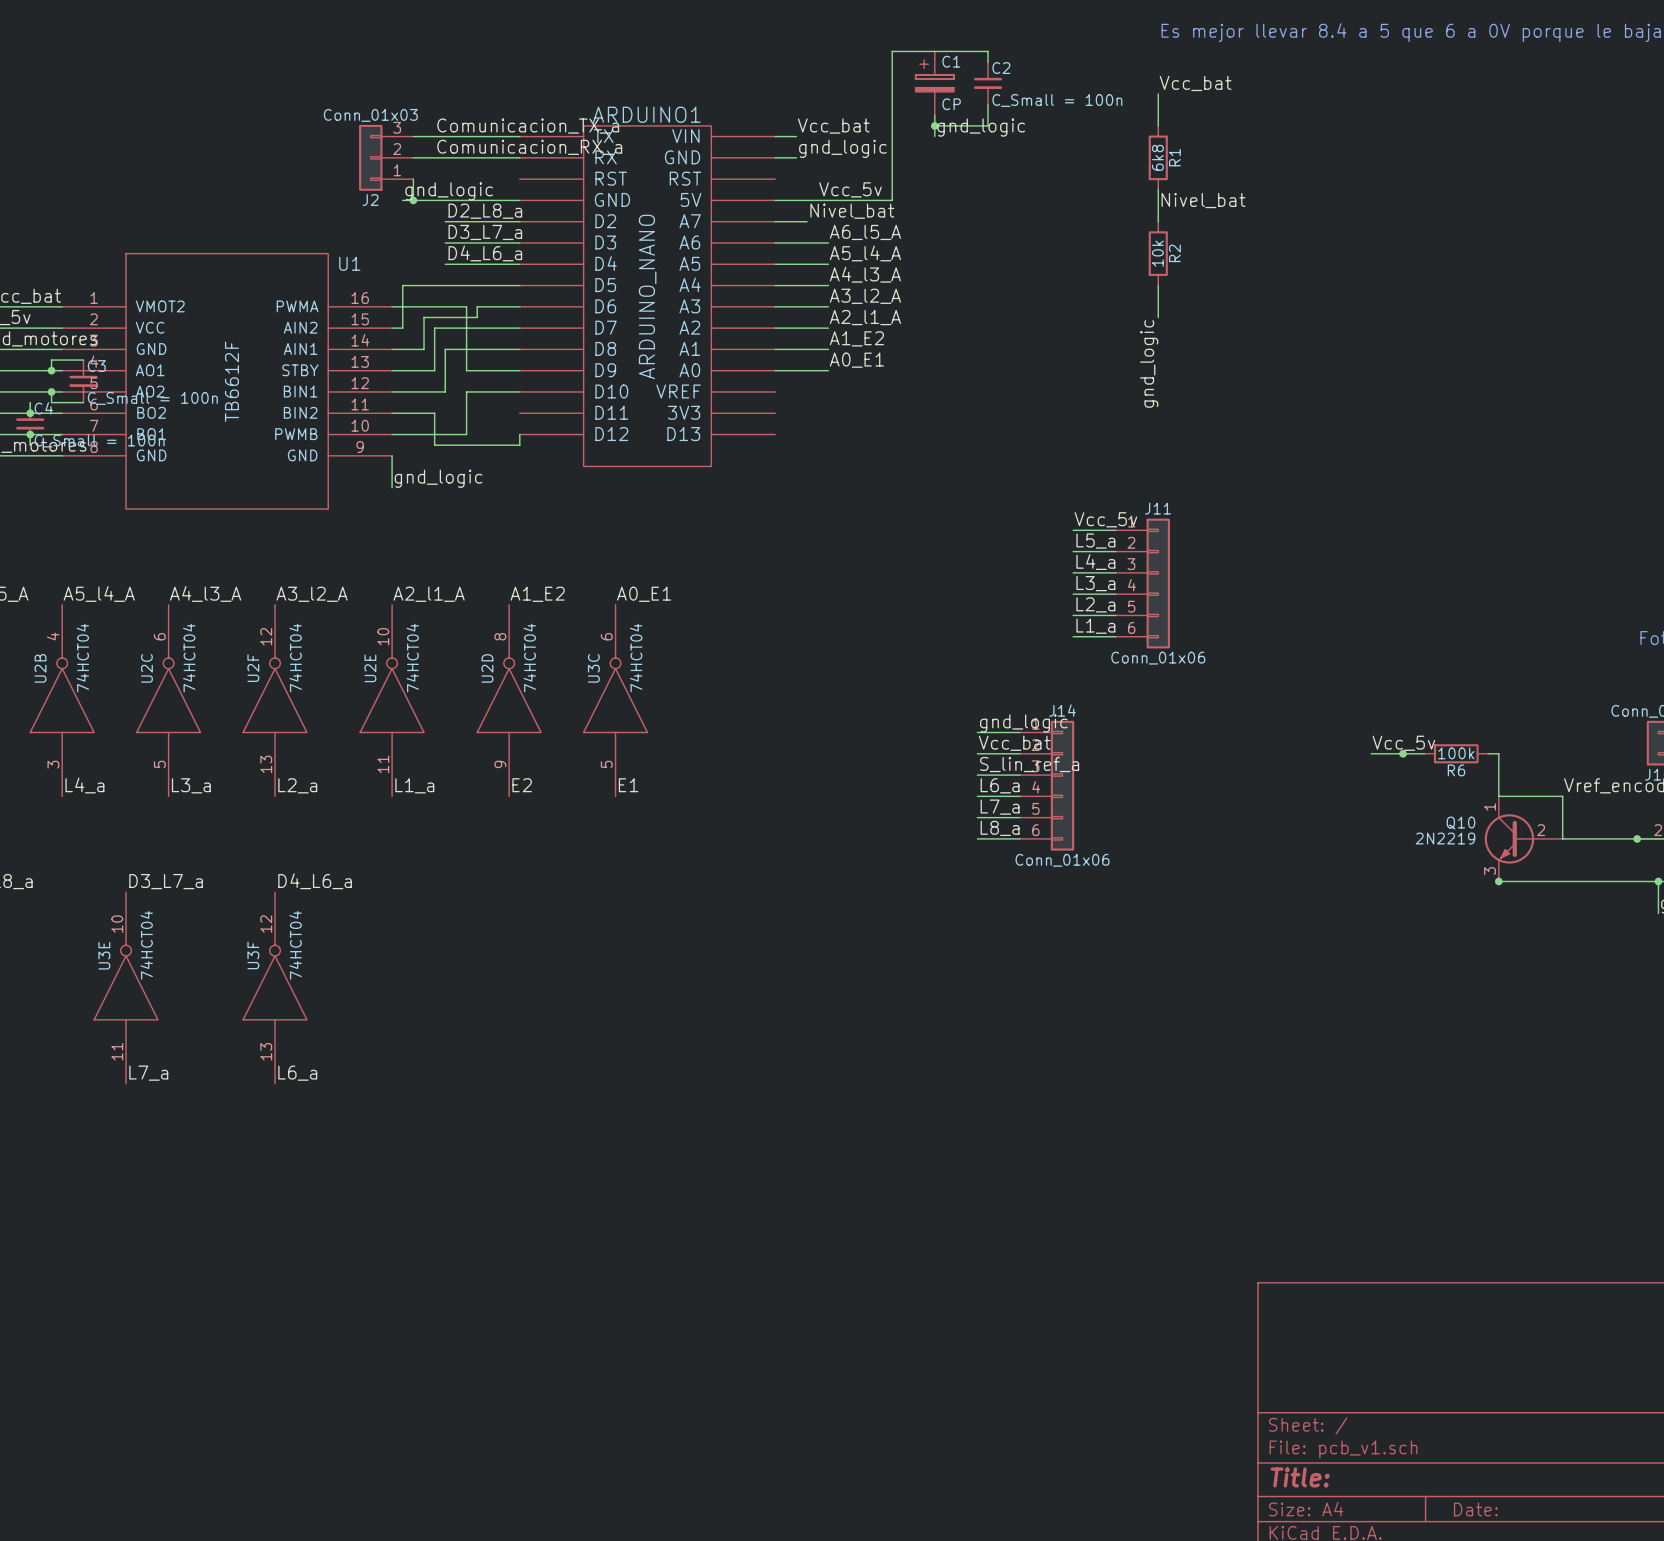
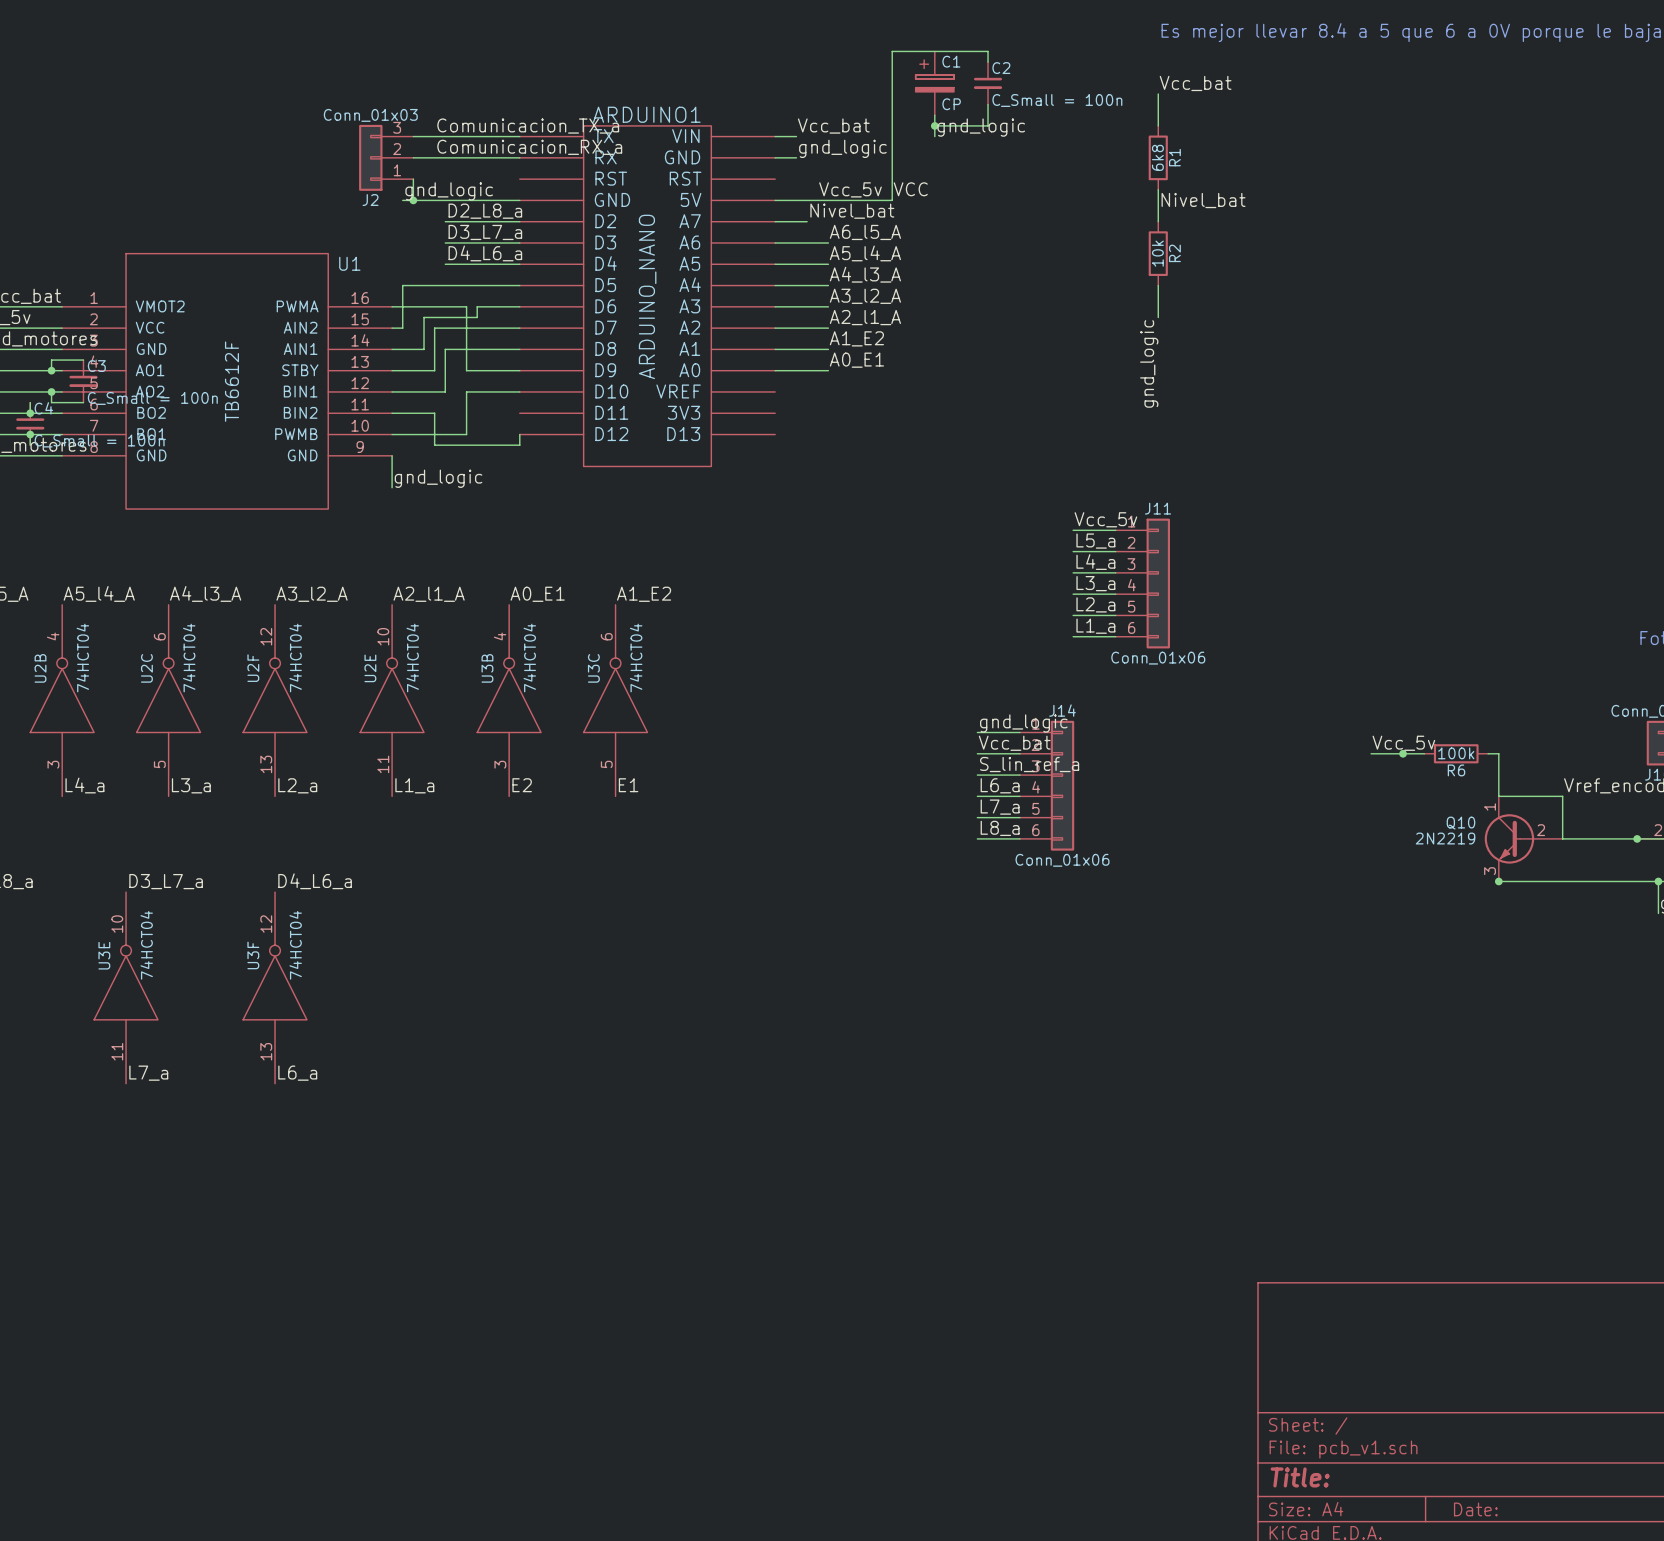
label: none -> VCC (910, 189)
label: A1_E2 (537, 594) -> A0_E1 (537, 594)
label: A0_E1 (644, 594) -> A1_E2 (644, 594)
U2D pin number: 8 (500, 636) -> 4 (500, 636)
U2D name: U2D (487, 668) -> U3B (487, 668)
U2D pin number: 9 (500, 764) -> 3 (500, 764)

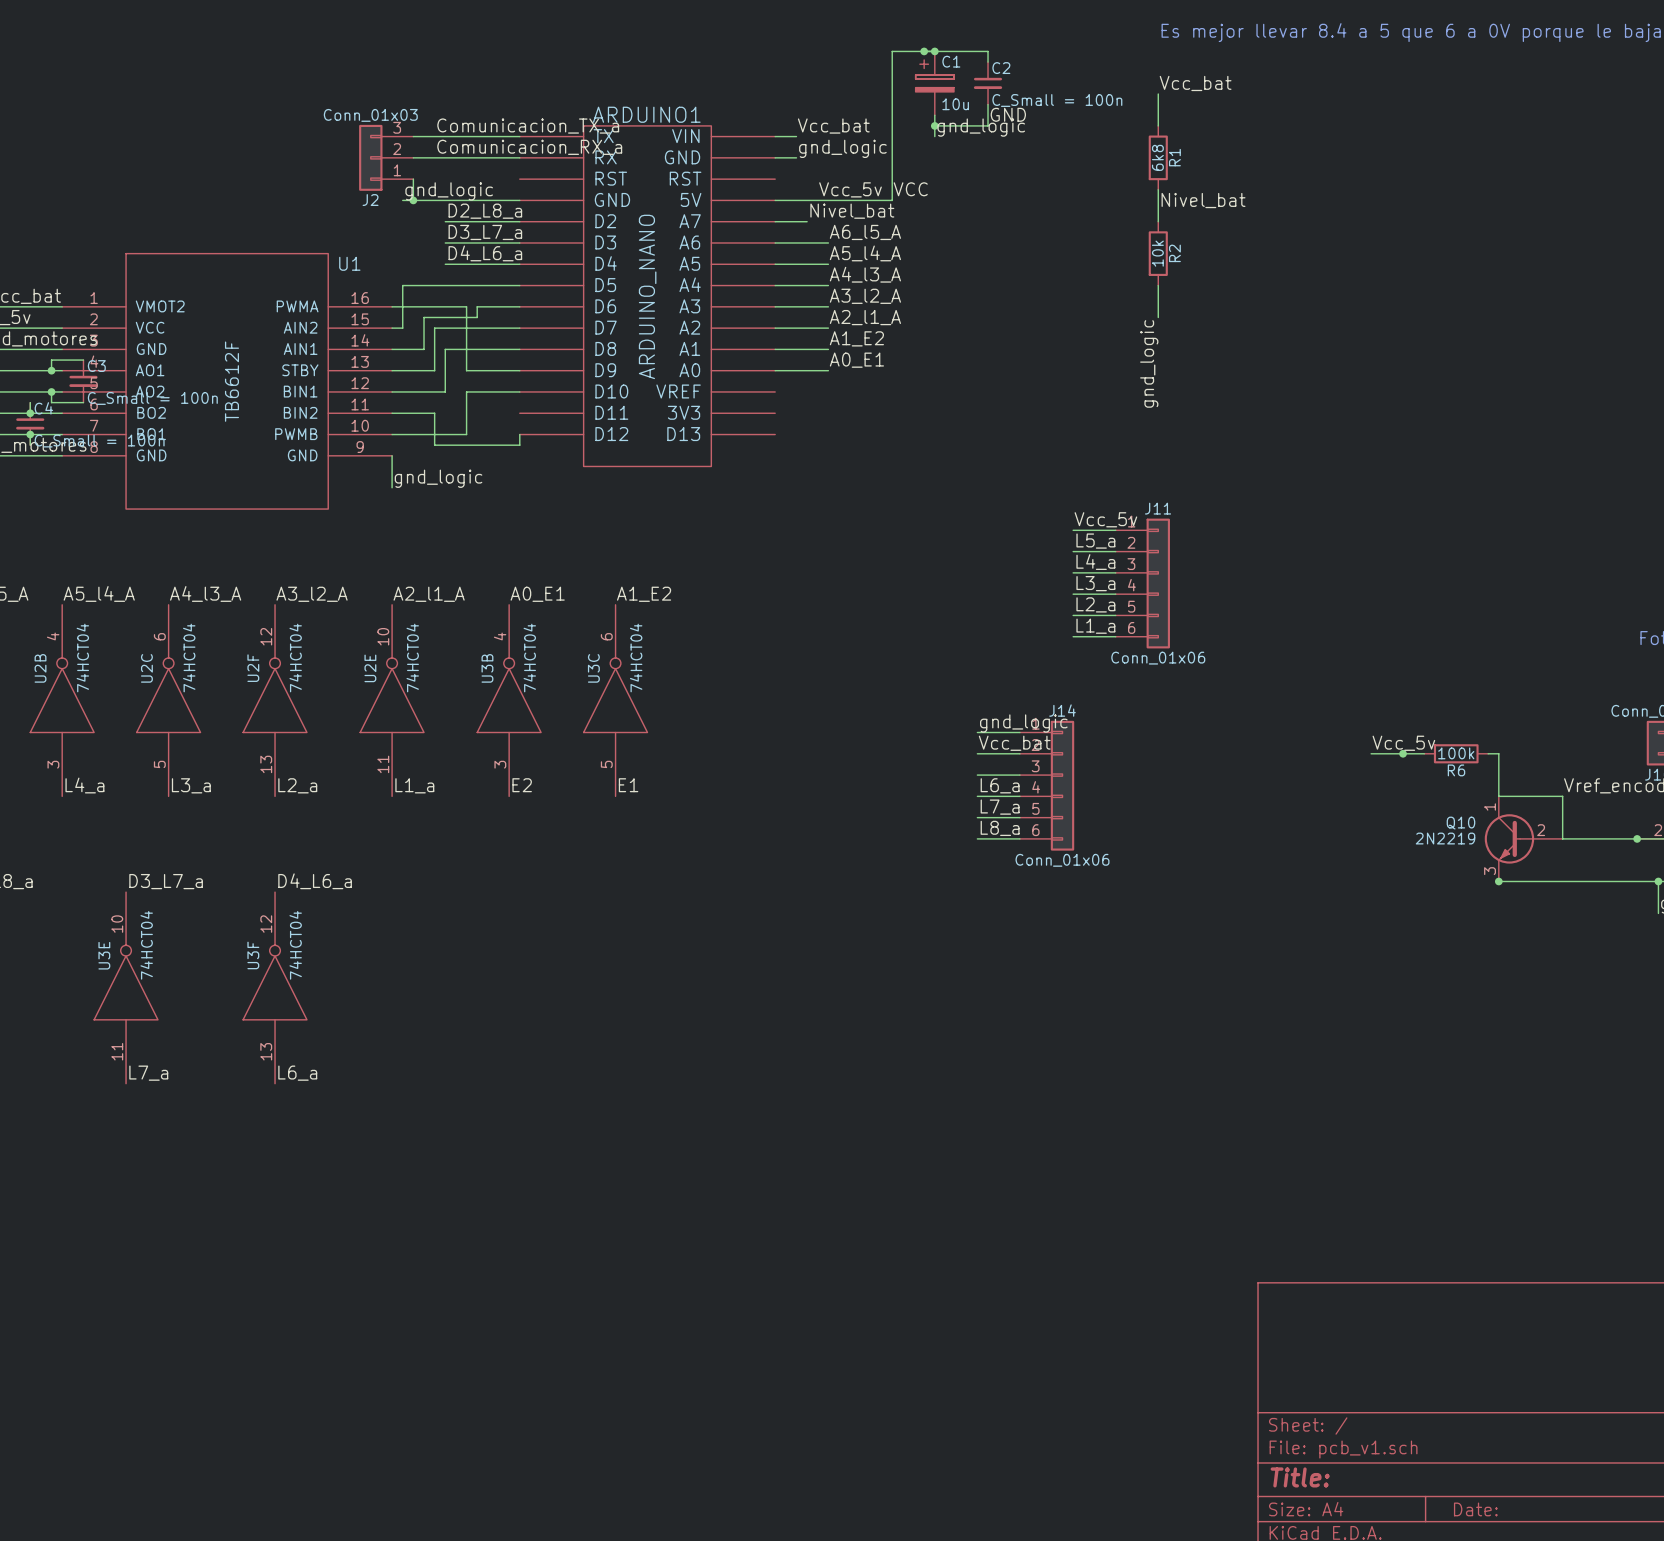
junction: none -> (924, 51)
junction: none -> (934, 51)
C1 value: CP (951, 104) -> 10u (955, 104)
label: none -> GND (1008, 114)
label: S_lin_ref_a (1029, 764) -> none

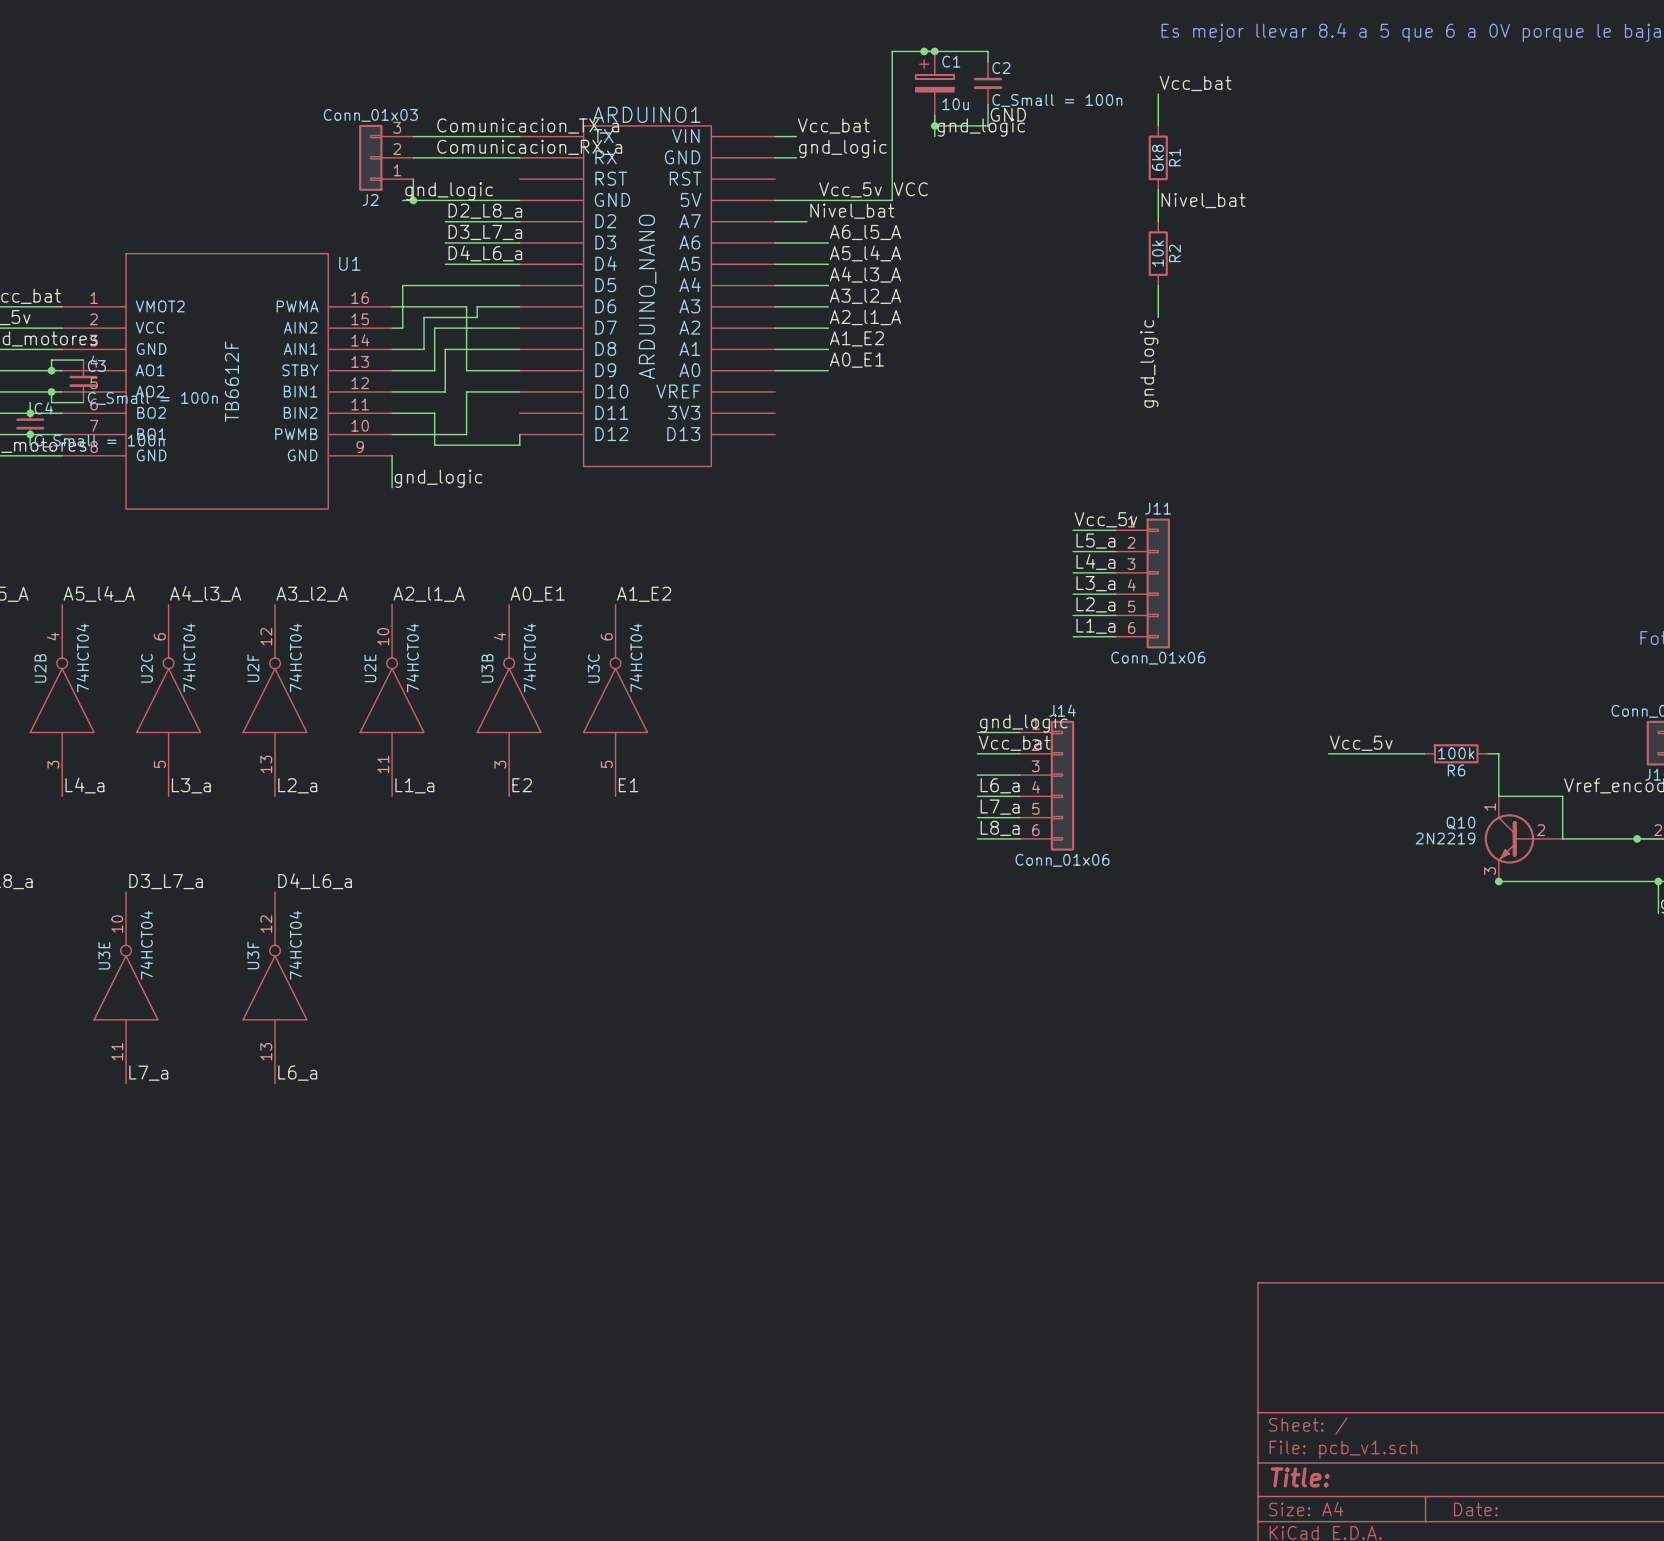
label position: Vcc_5v (1403, 743) -> Vcc_5v (1361, 743)
wire: none -> (1328, 753) (1371, 753)
junction: (1403, 753) -> none

